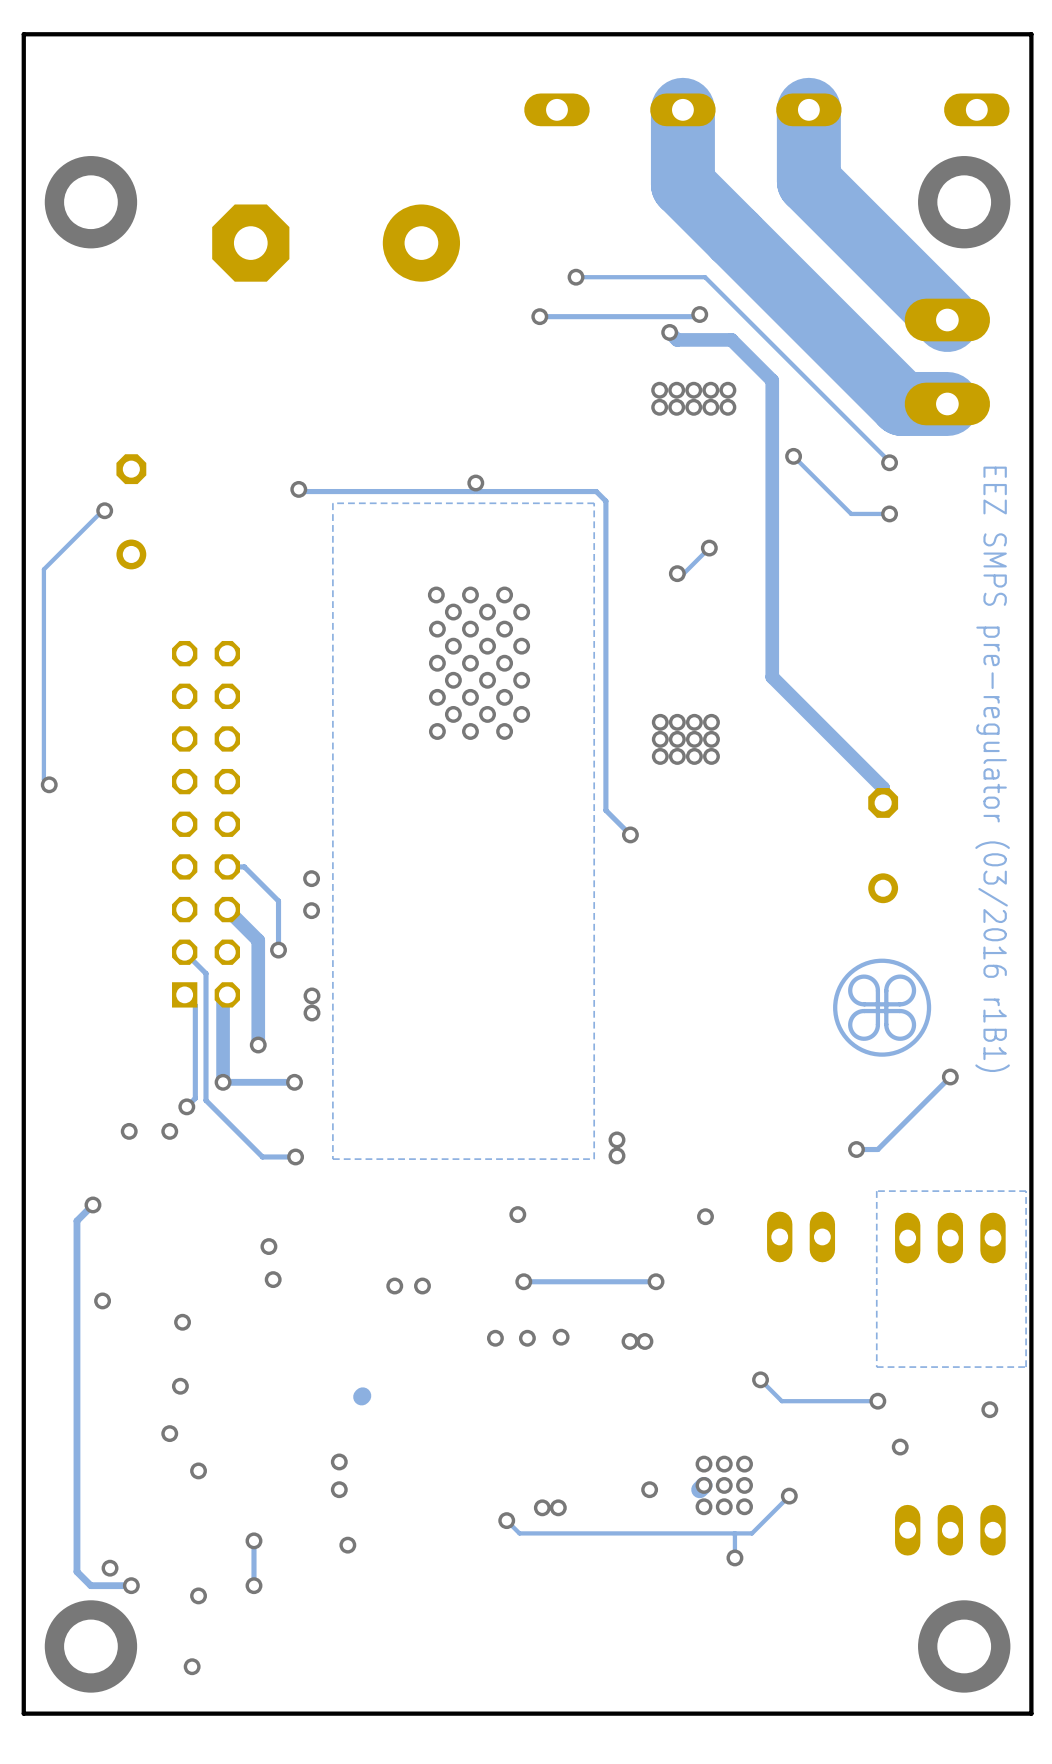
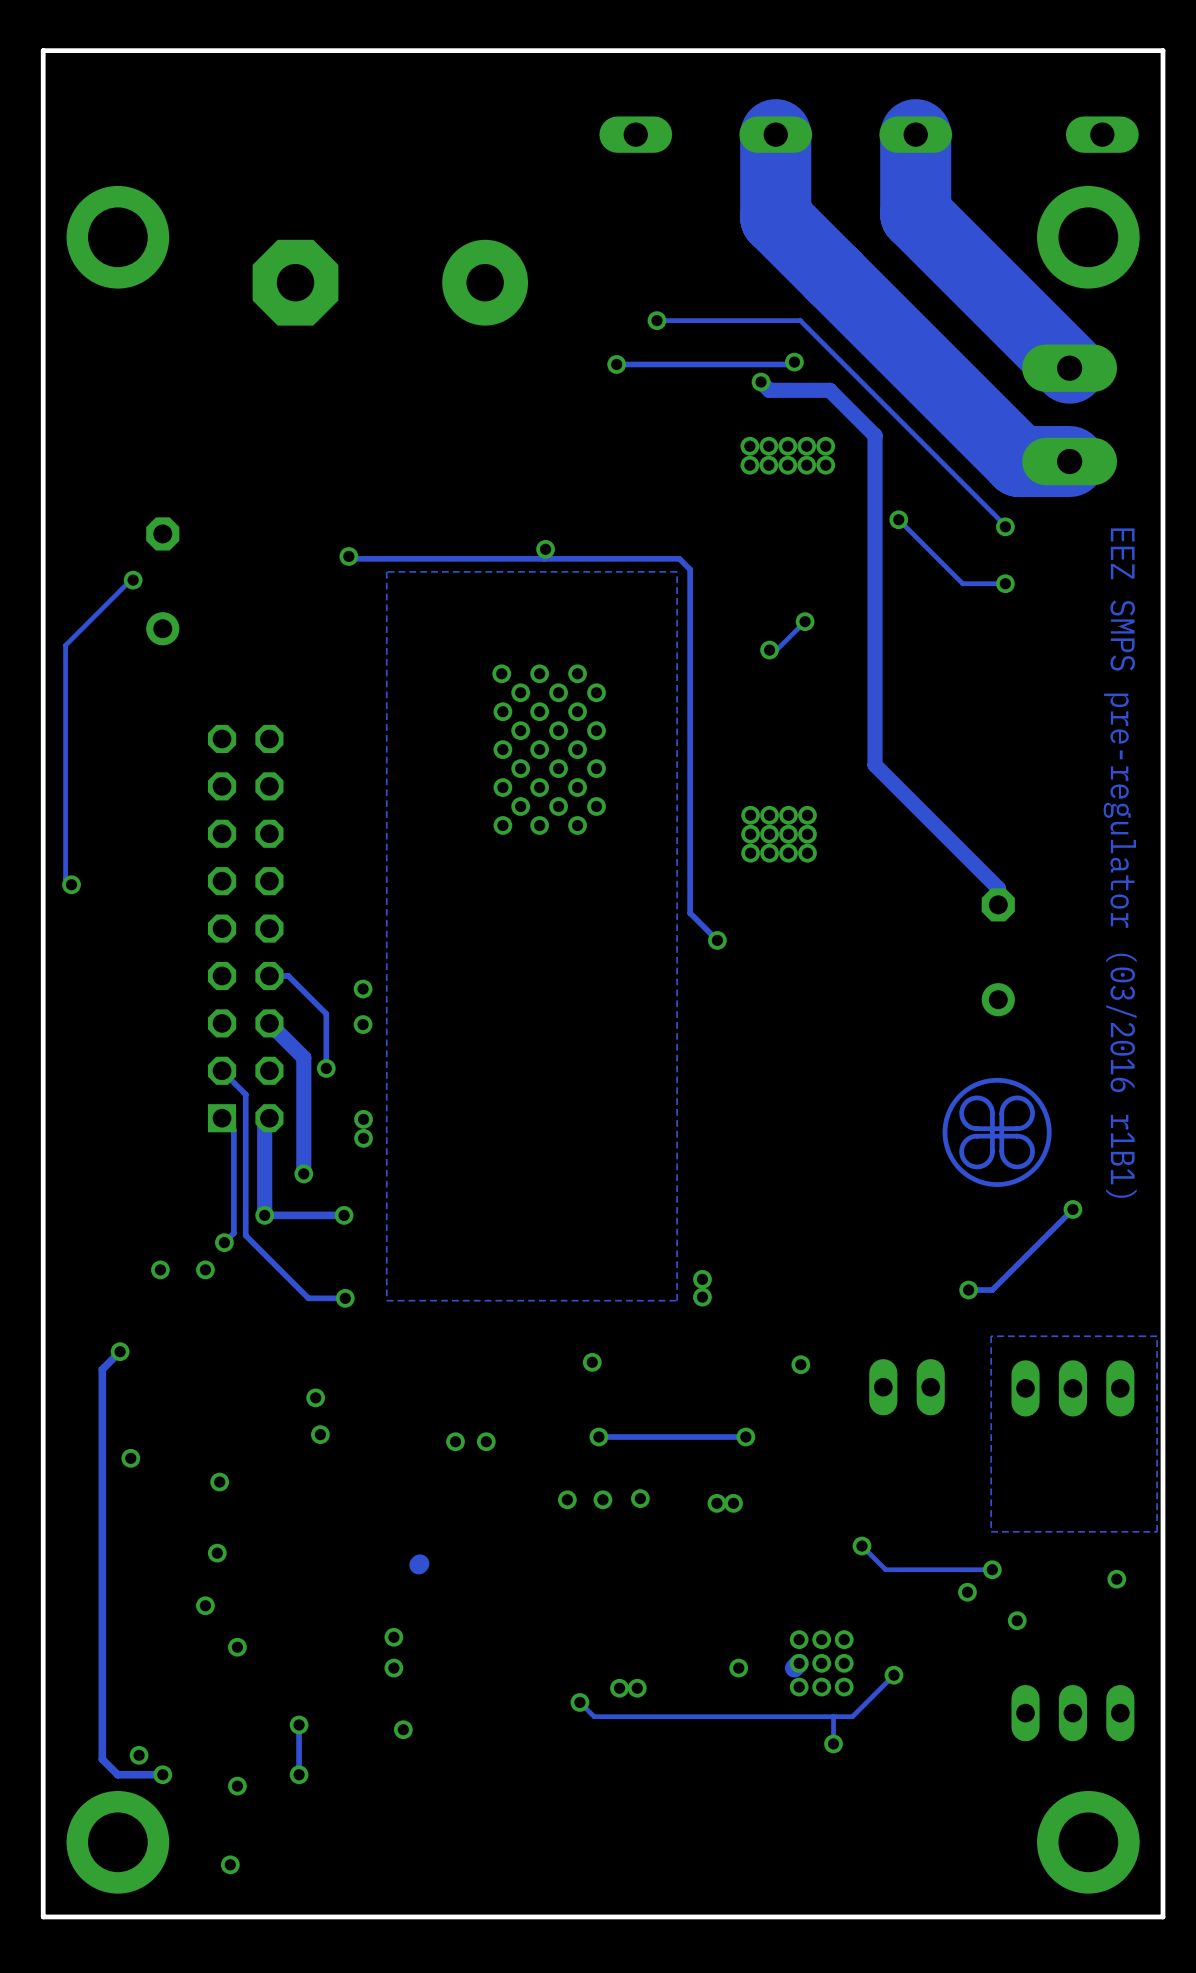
via: none -> (967, 1592)

